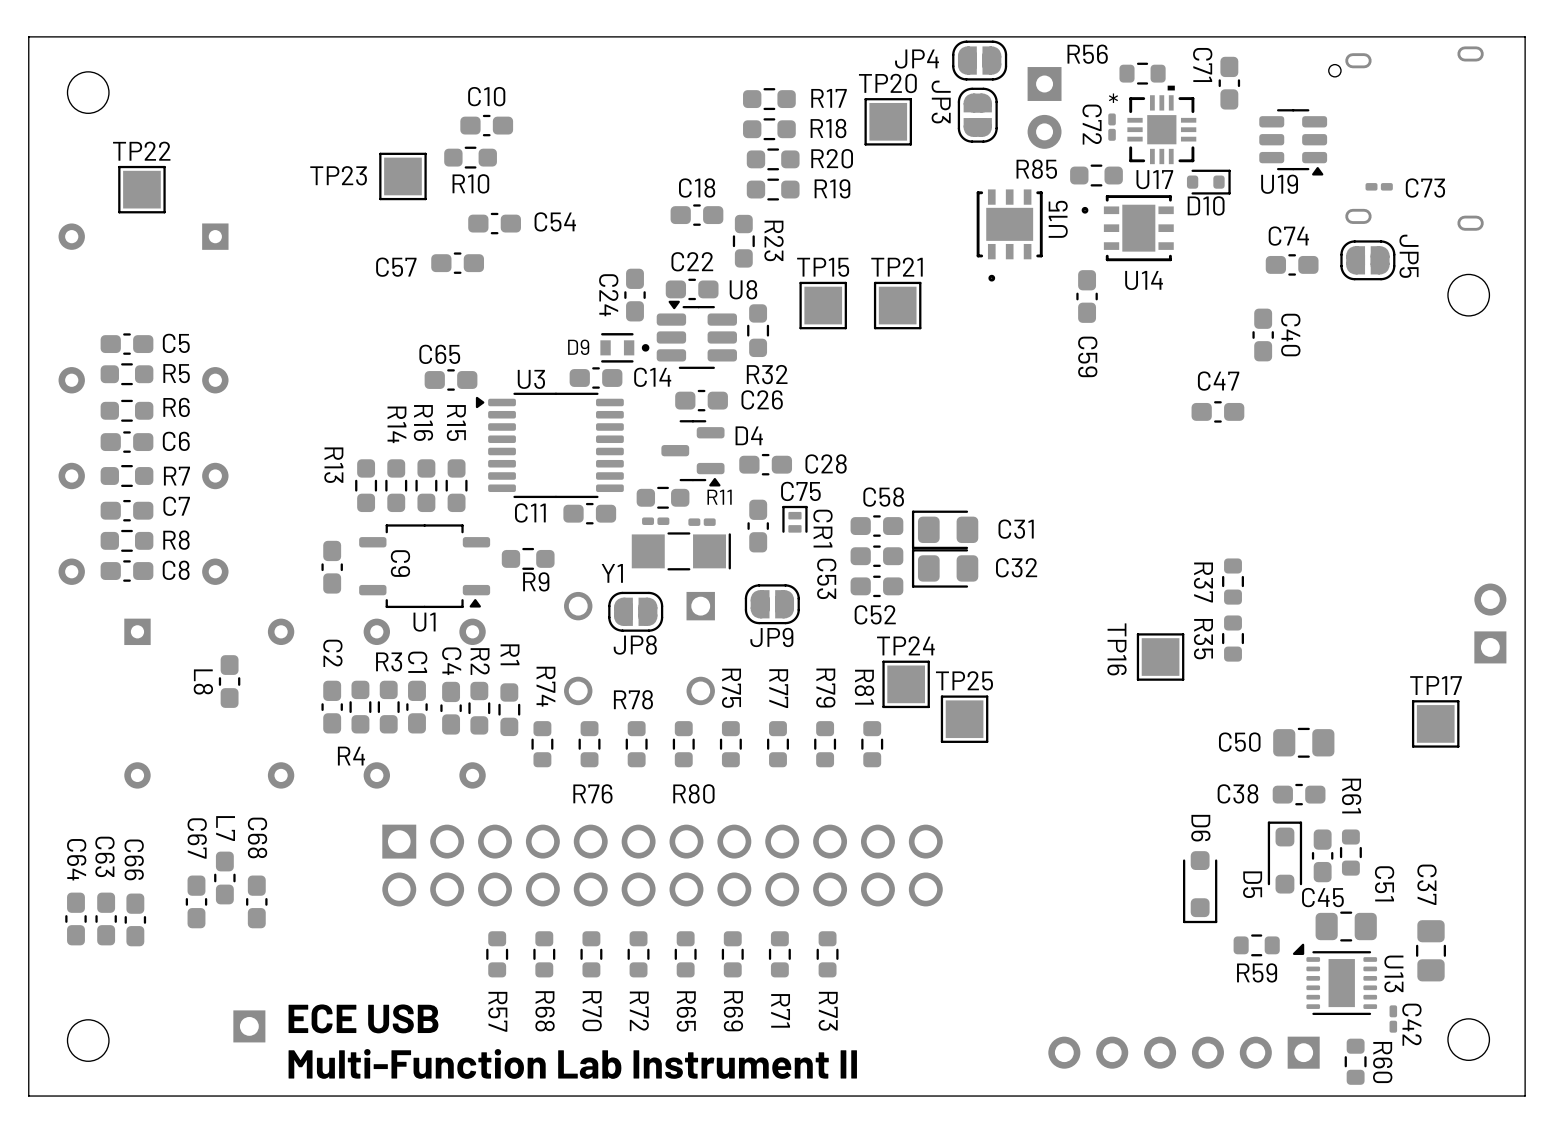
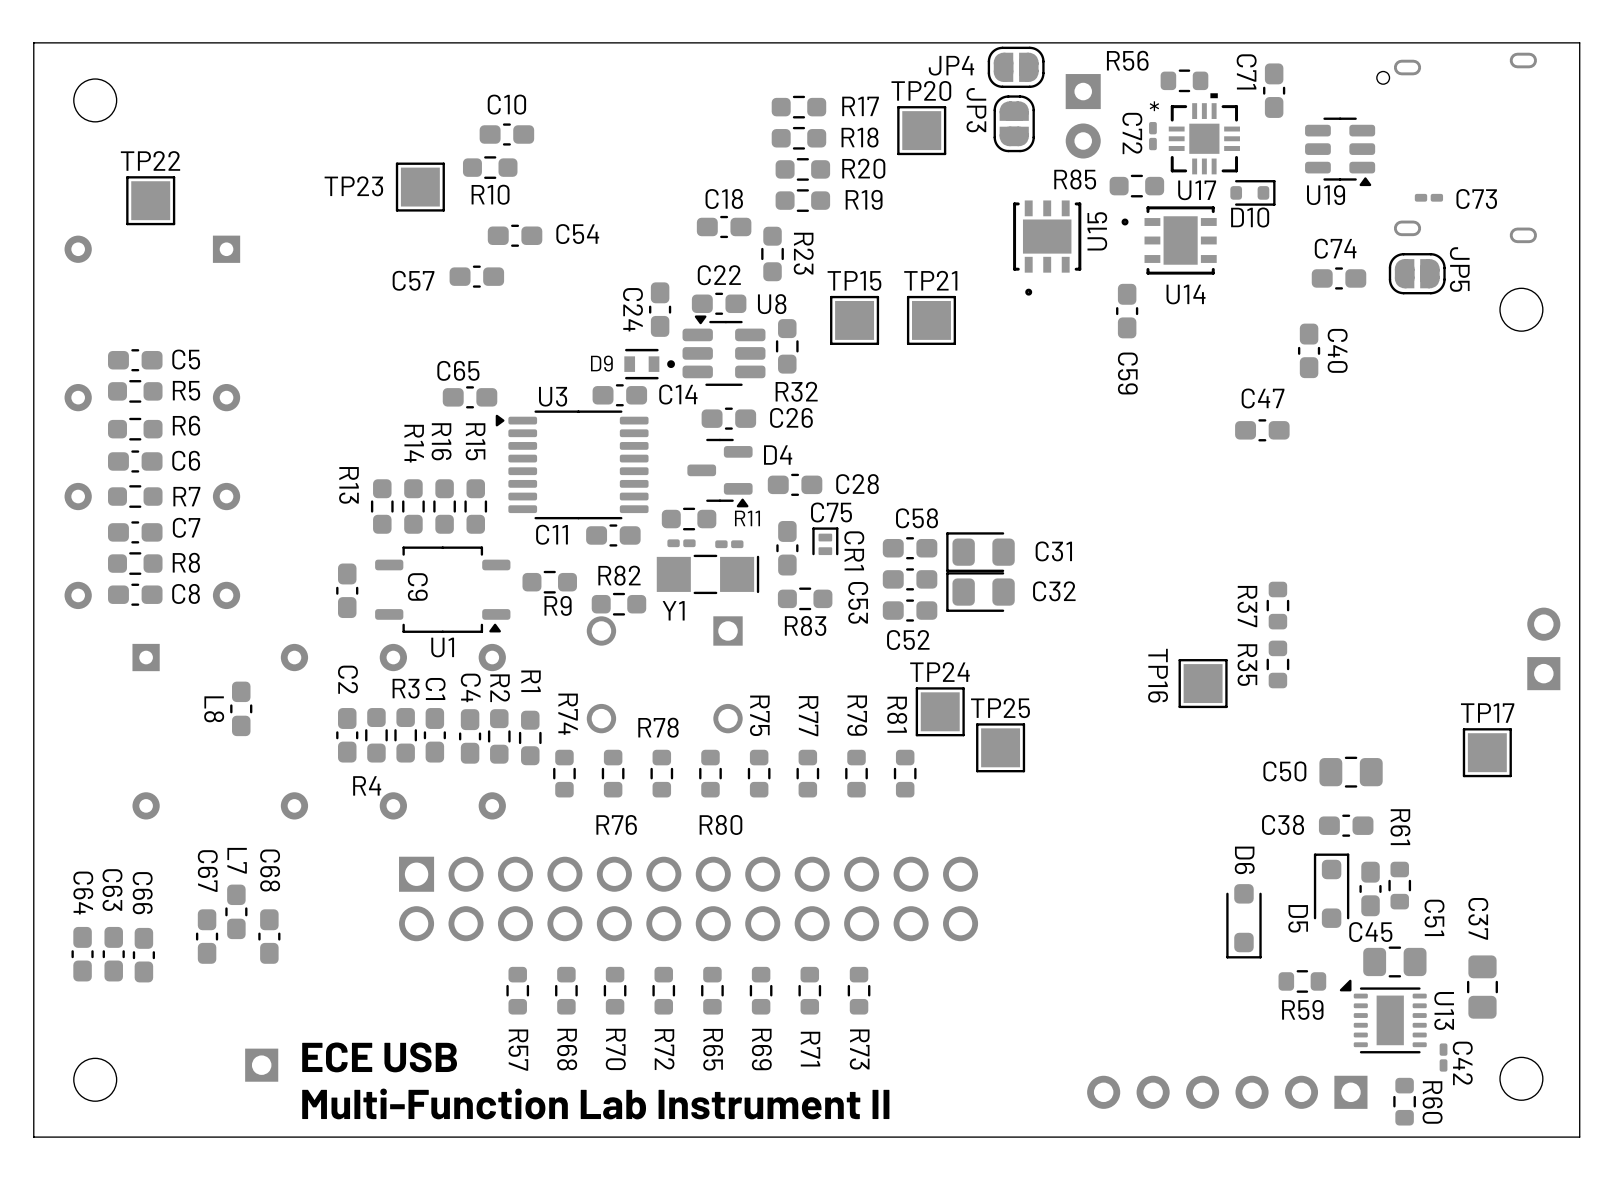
Y1 name position: Y1 (612, 573) -> Y1 (673, 610)
R83: none -> (805, 598)
R82: none -> (618, 604)
JP9: (772, 604) -> none
JP8: (635, 611) -> none

